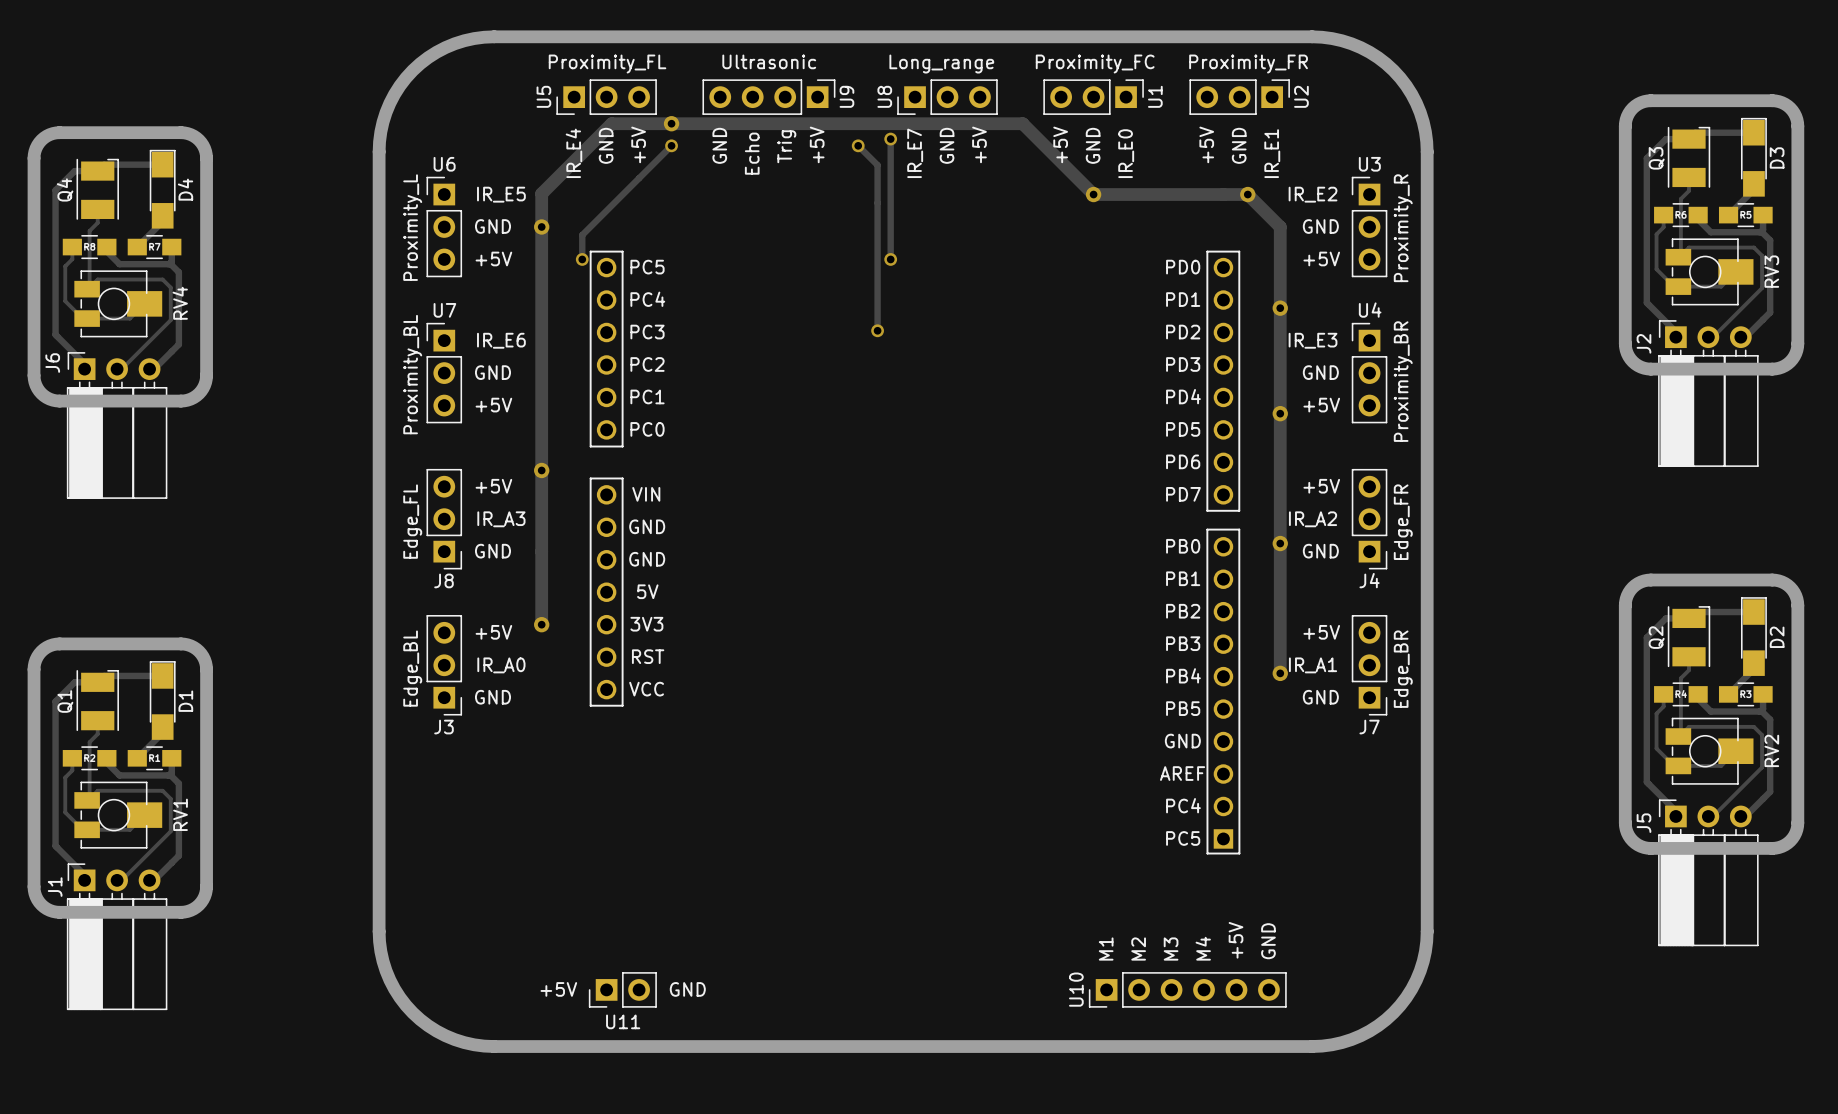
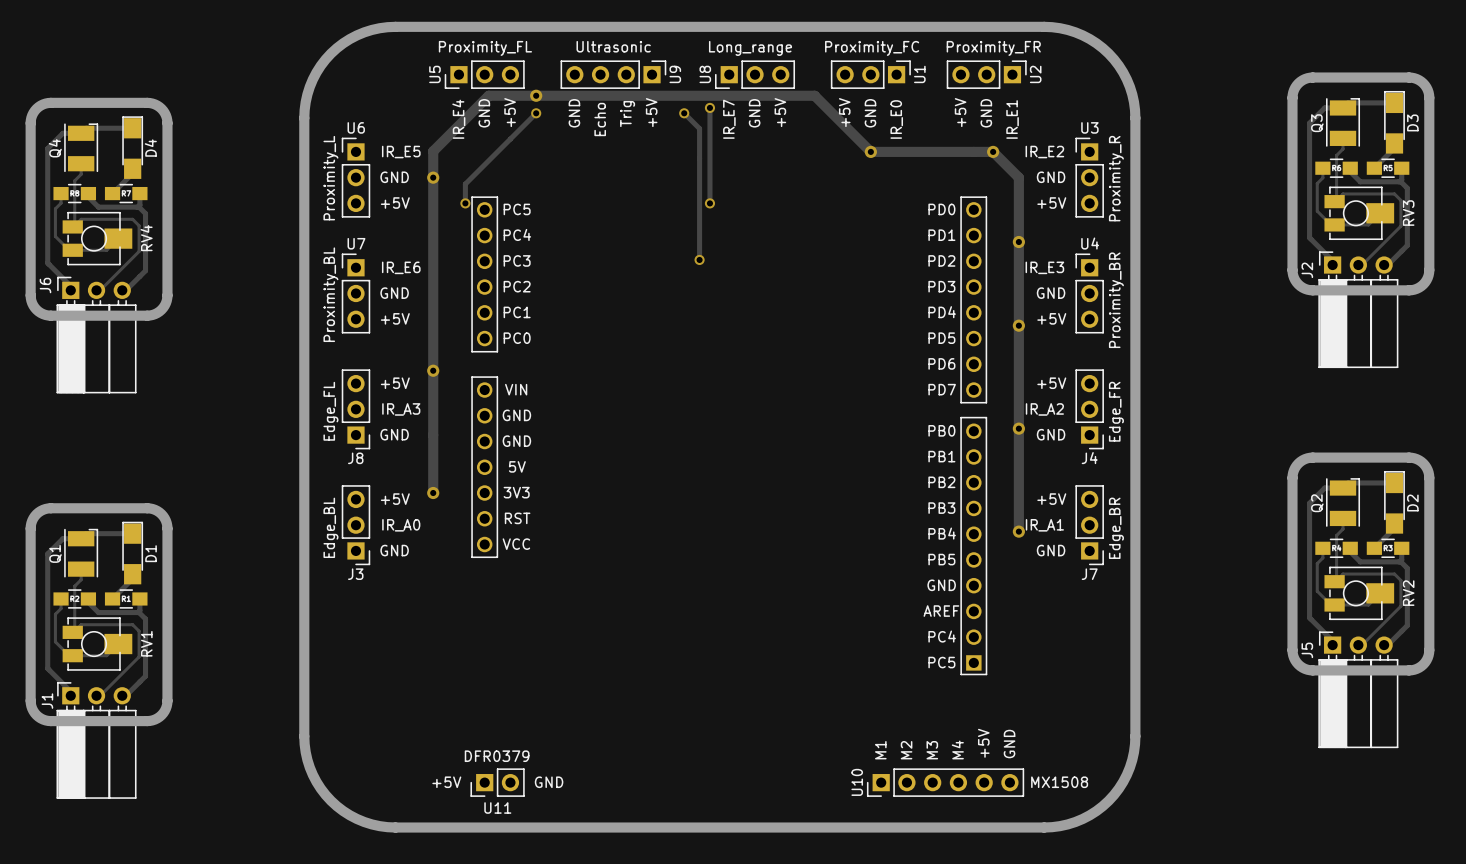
U11 value: none -> DFR0379 (497, 756)
U10 value: none -> MX1508 (1059, 782)

